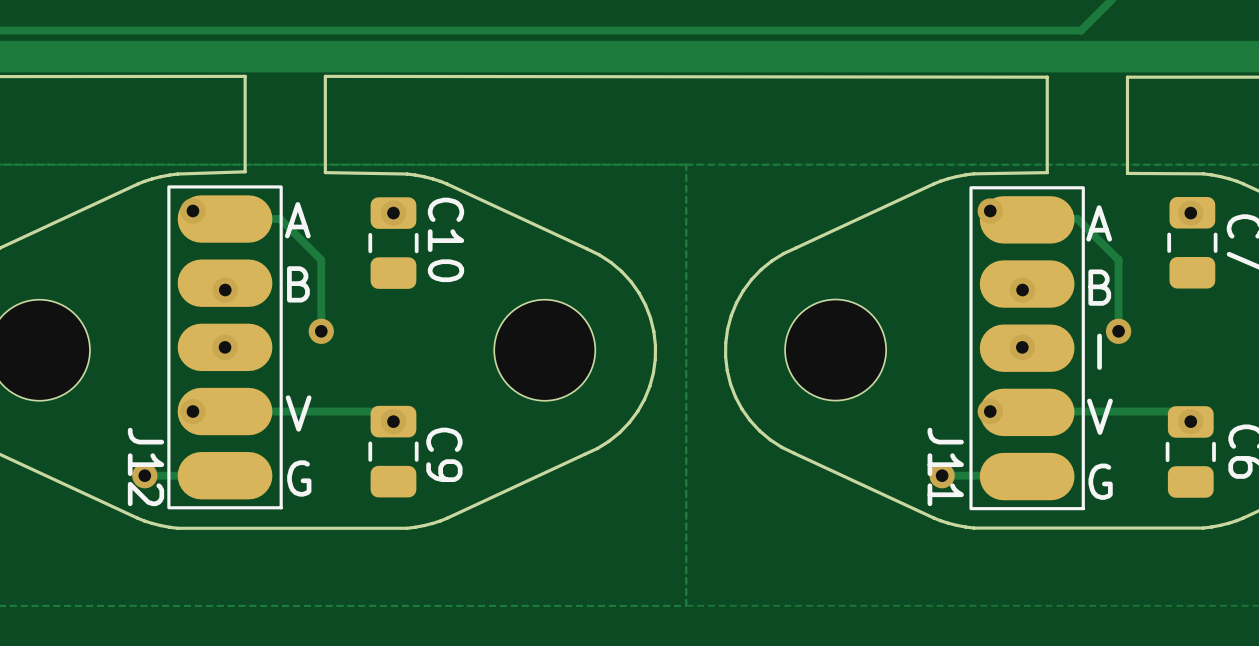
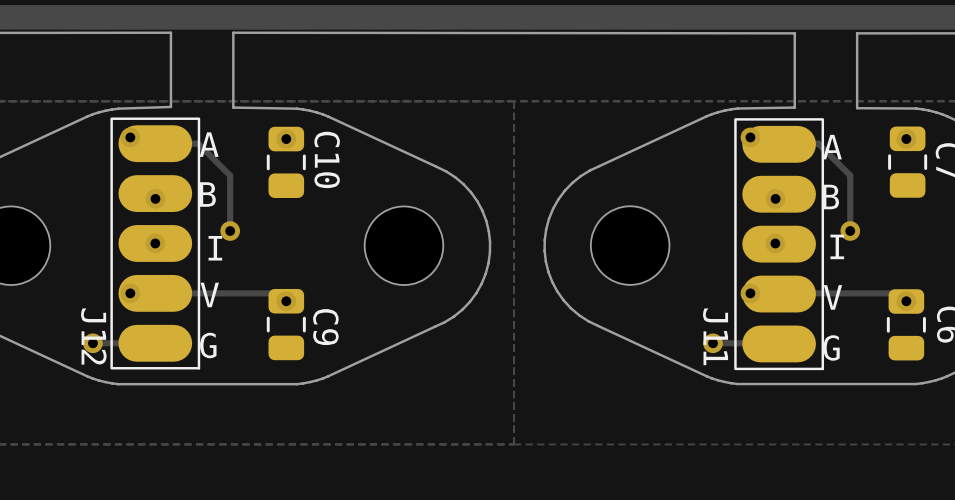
text: none -> I (215, 248)

